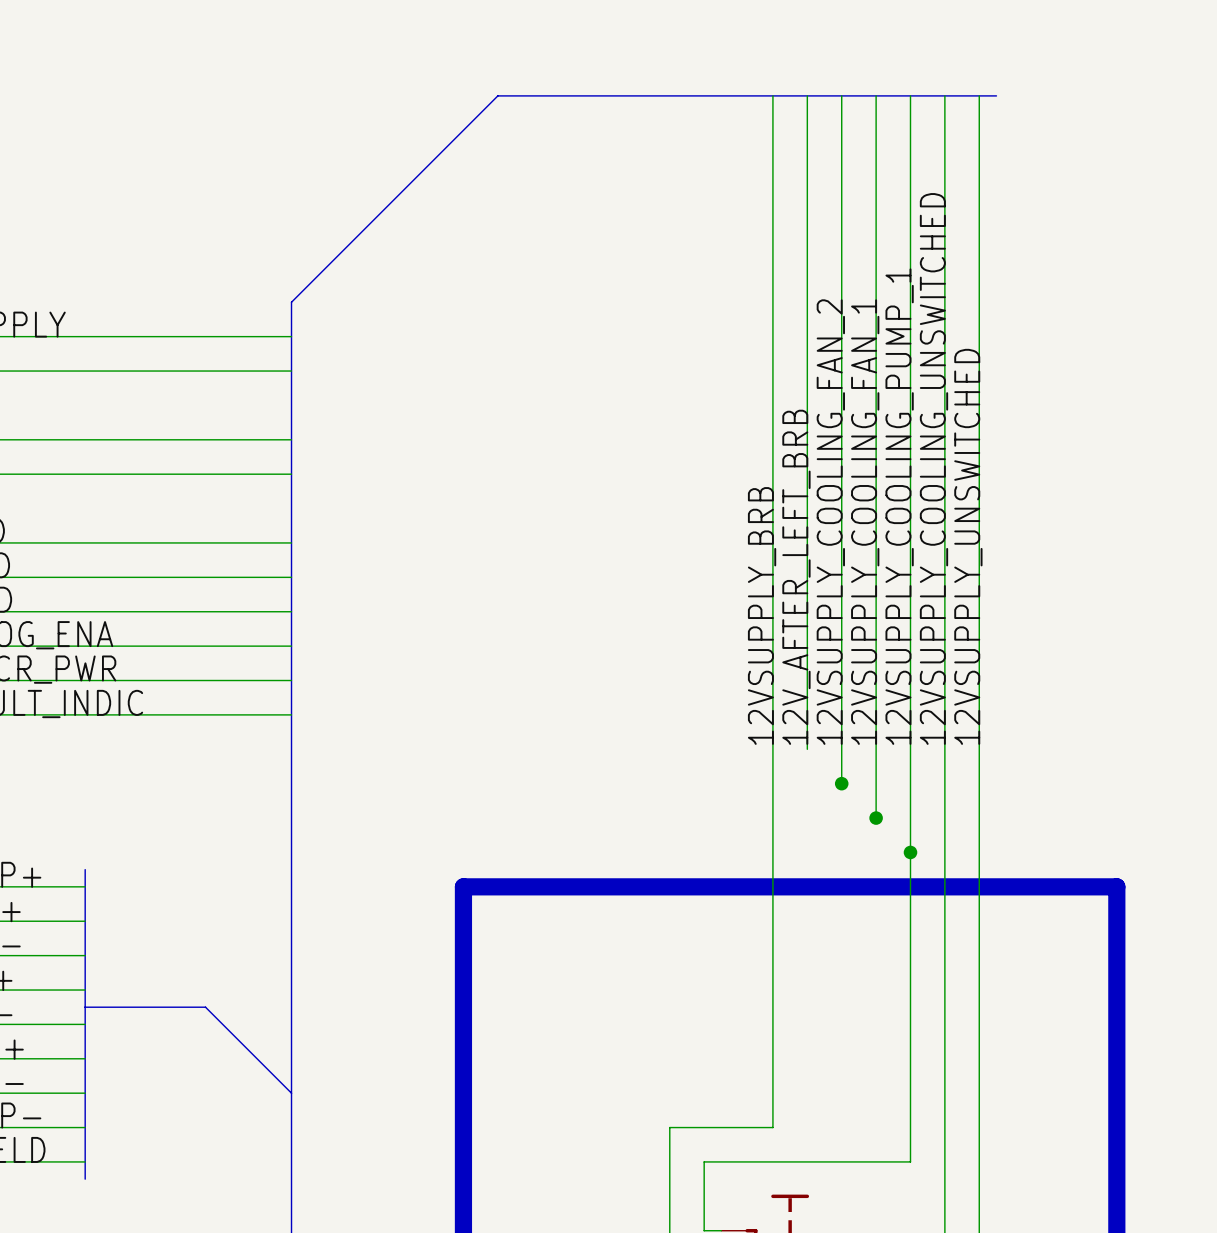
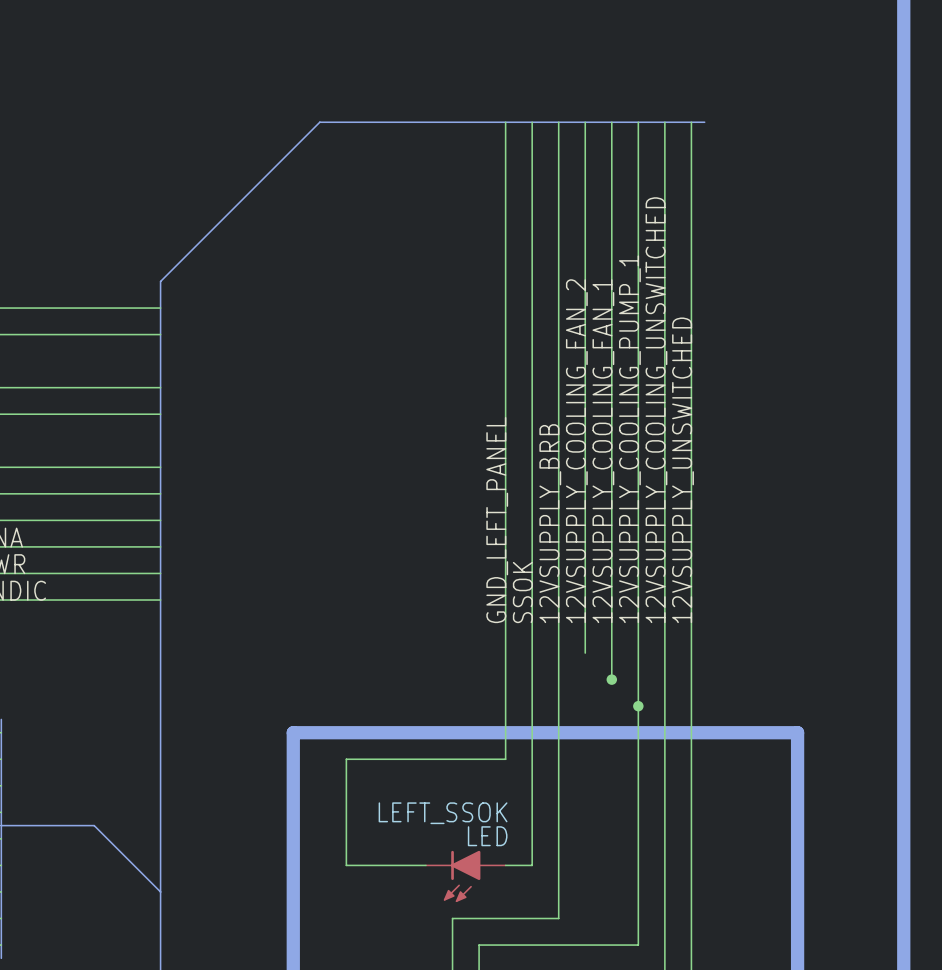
wire: none -> (505, 122) (505, 759) (346, 759) (346, 865) (425, 865)
label: 12V_AFTER_LEFT_BRB (796, 577) -> 12VSUPPLY_BRB (550, 523)
label: none -> GND_LEFT_PANEL (497, 520)
label: 12VSUPPLY_BRB (762, 615) -> SSOK (522, 592)
wire: none -> (558, 626) (558, 918) (532, 918)
junction: (841, 783) -> none
wire: (772, 1058) (772, 1127) -> (532, 865) (505, 865)
LEFT_SSOK: none -> LED (465, 876)

